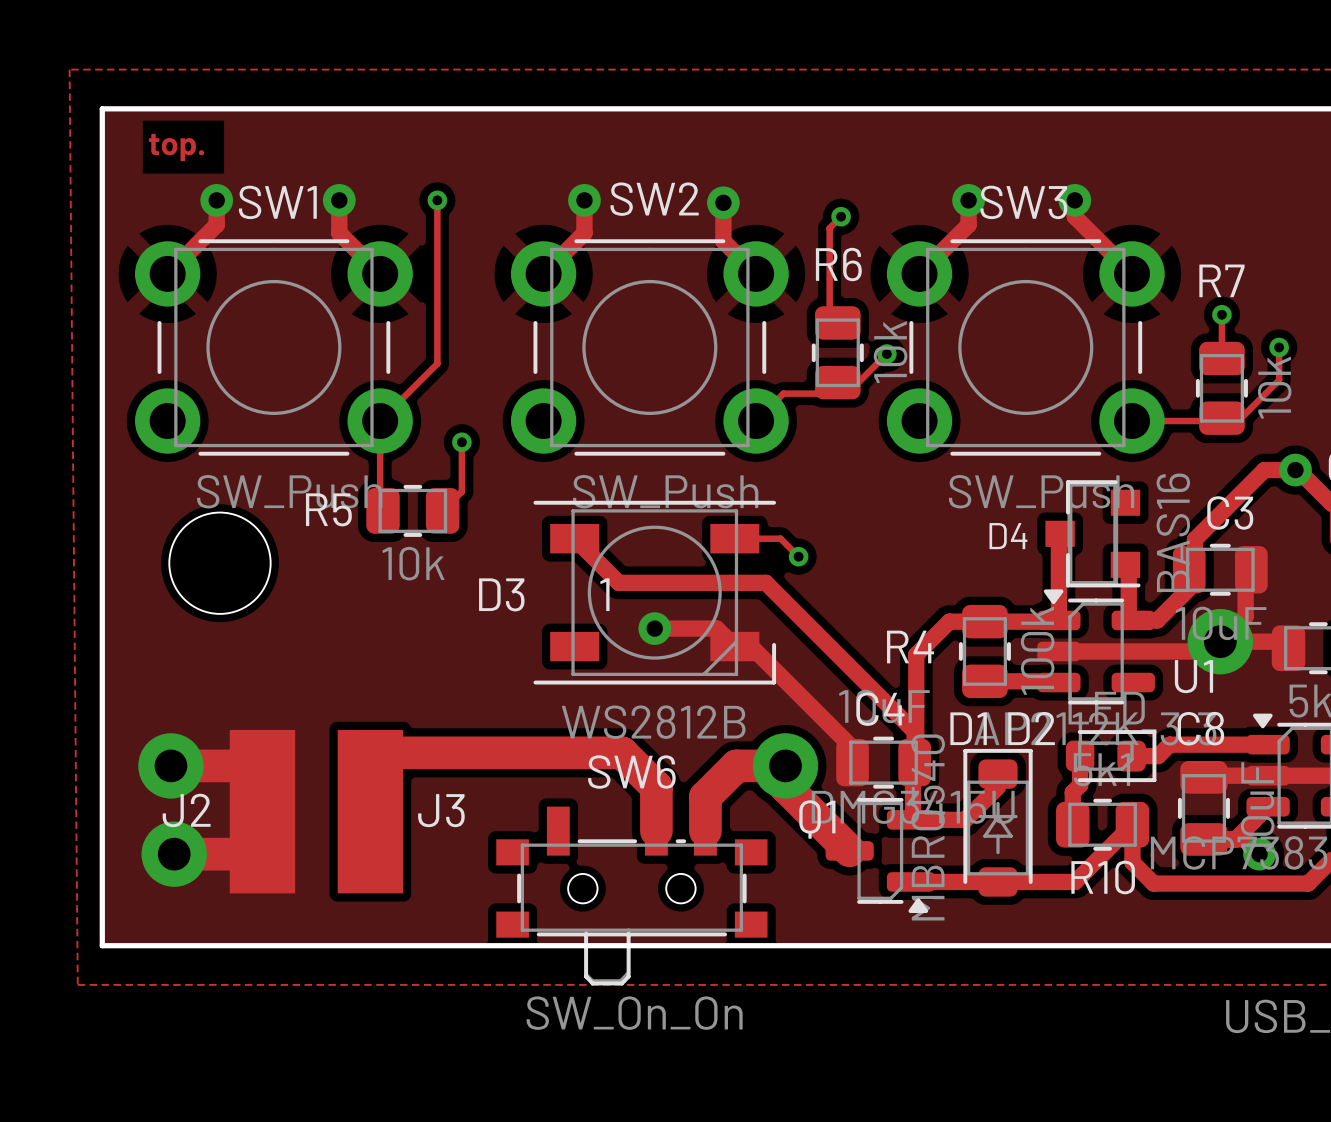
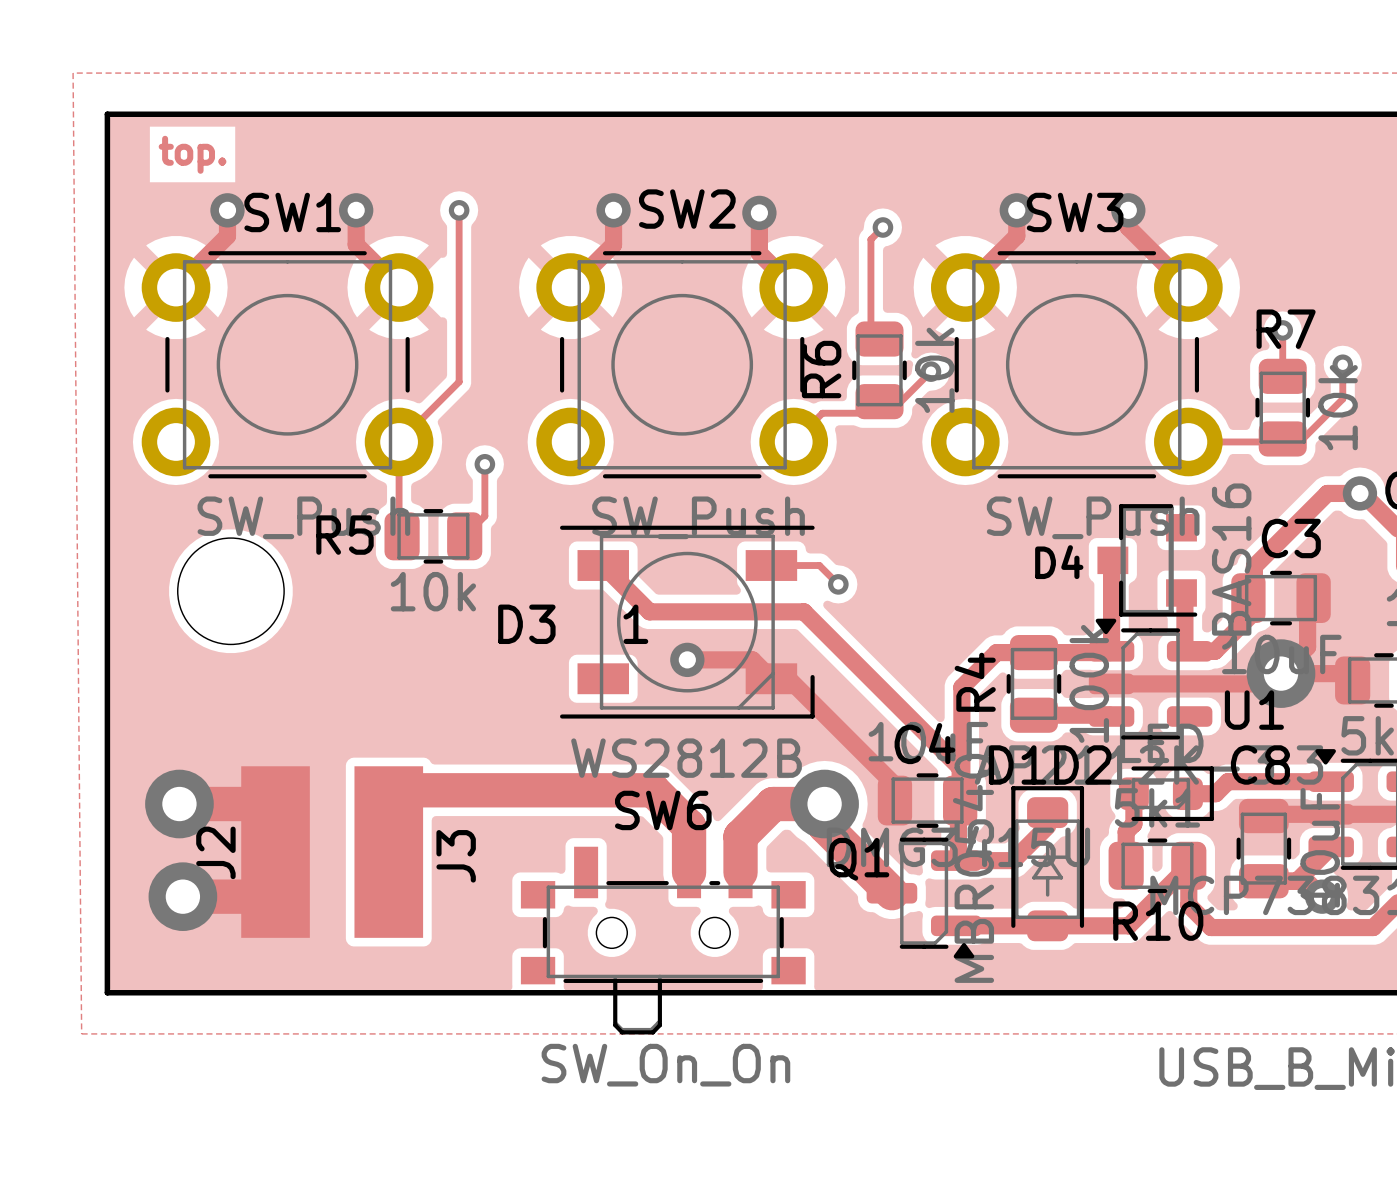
R6 name rotation: 0° (838, 264) -> 90° counterclockwise (821, 369)
R6 name position: R6 (838, 264) -> R6 (821, 369)
R7 name position: R7 (1221, 280) -> R7 (1286, 329)
R4 name rotation: 0° (910, 647) -> 90° counterclockwise (975, 682)
J2 name rotation: 0° (186, 810) -> 90° counterclockwise (215, 852)
J3 name rotation: 0° (441, 810) -> 90° counterclockwise (456, 856)

